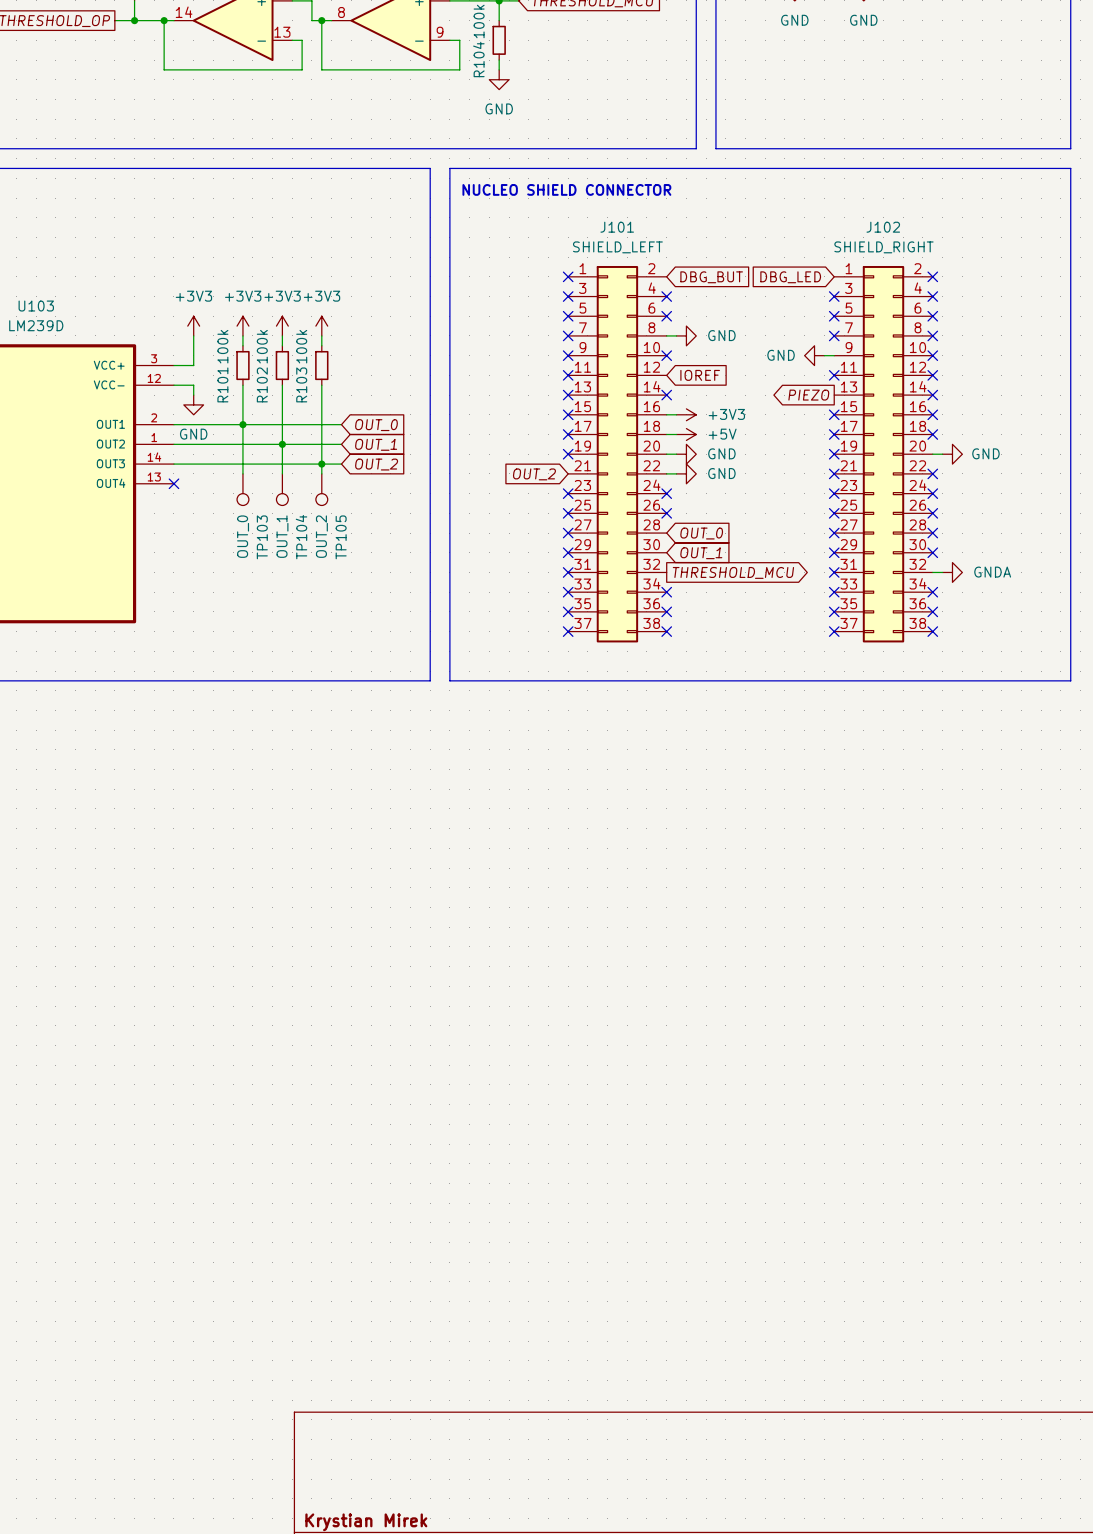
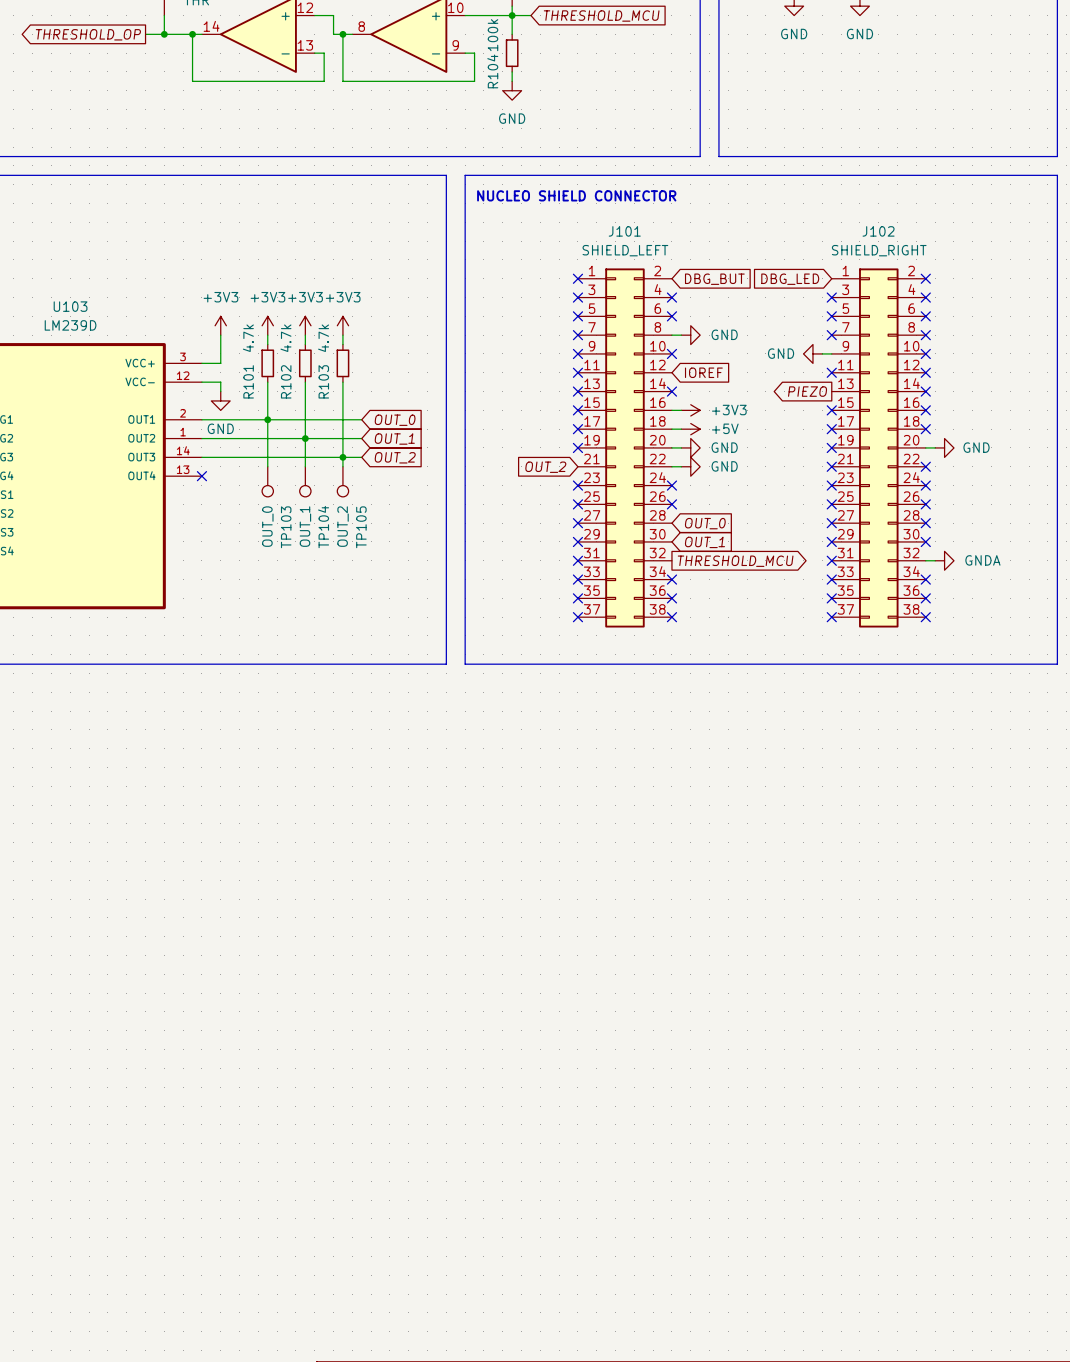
R101 value: 100k (222, 346) -> 4.7k (248, 338)
R102 value: 100k (262, 346) -> 4.7k (285, 338)
R103 value: 100k (301, 346) -> 4.7k (323, 338)

